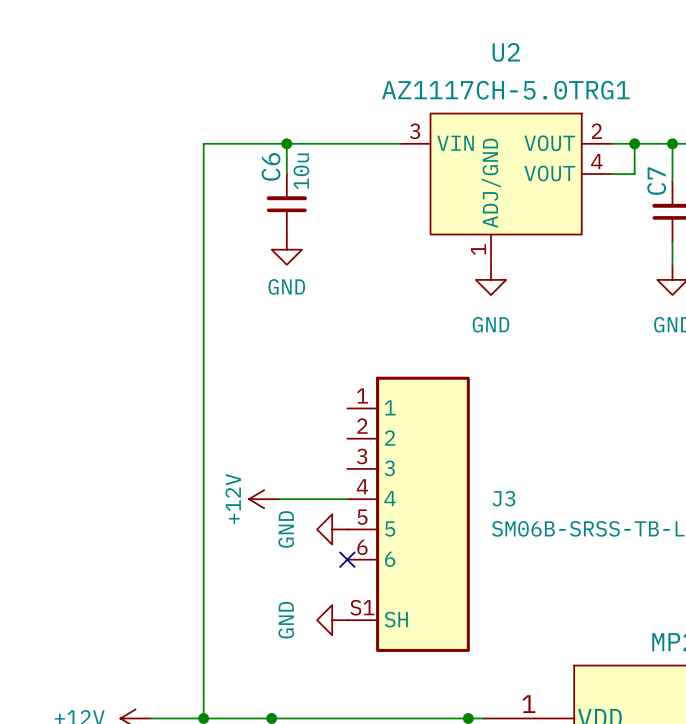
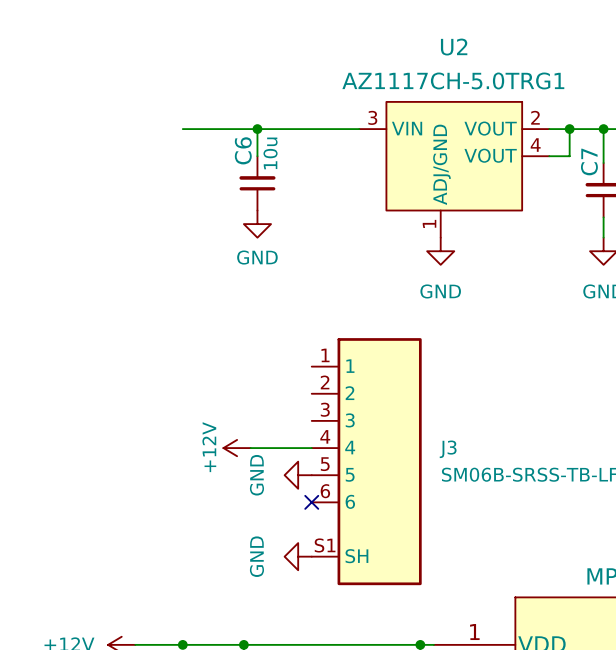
wire: (203, 143) (203, 718) -> none

